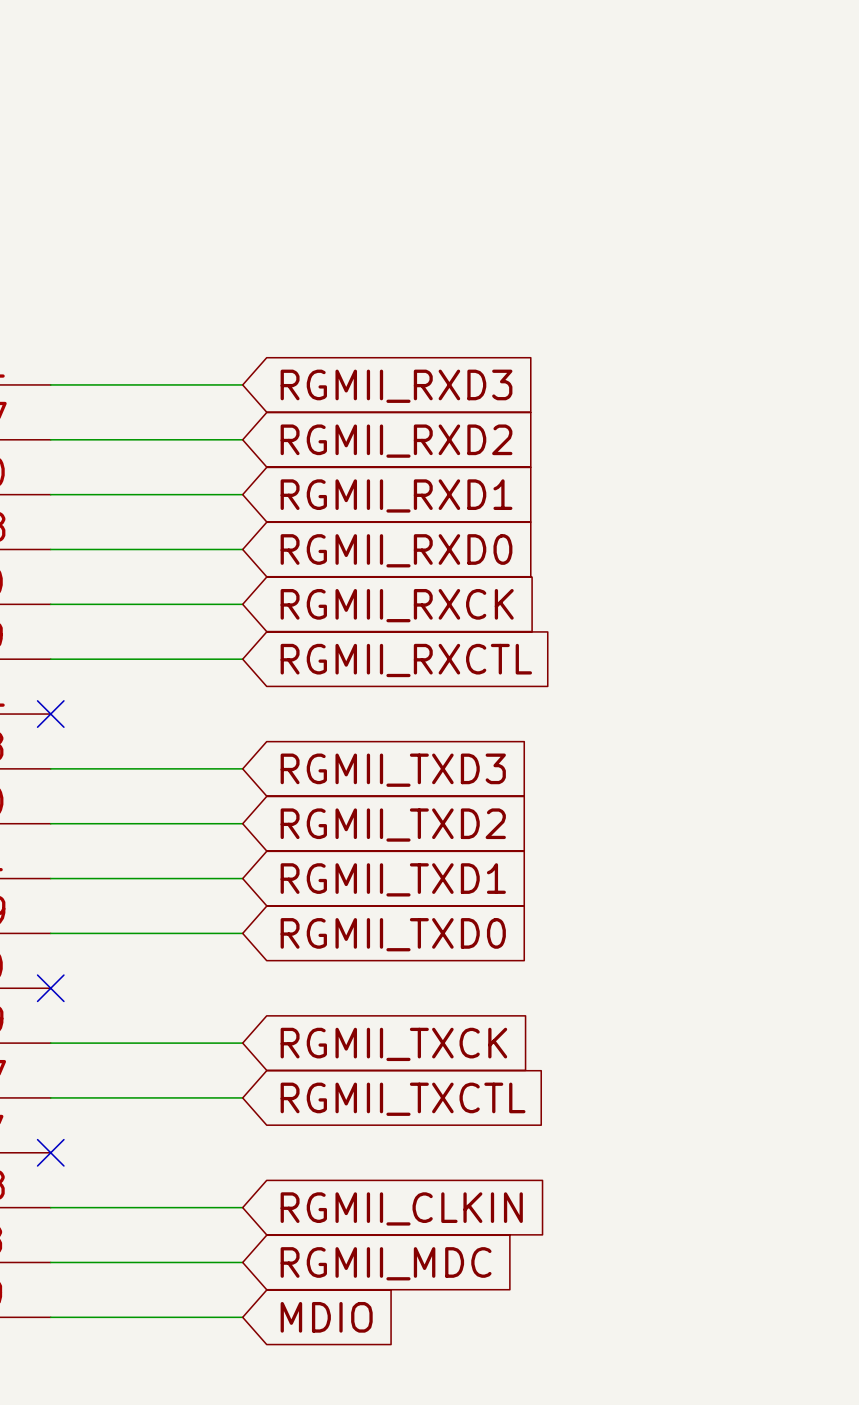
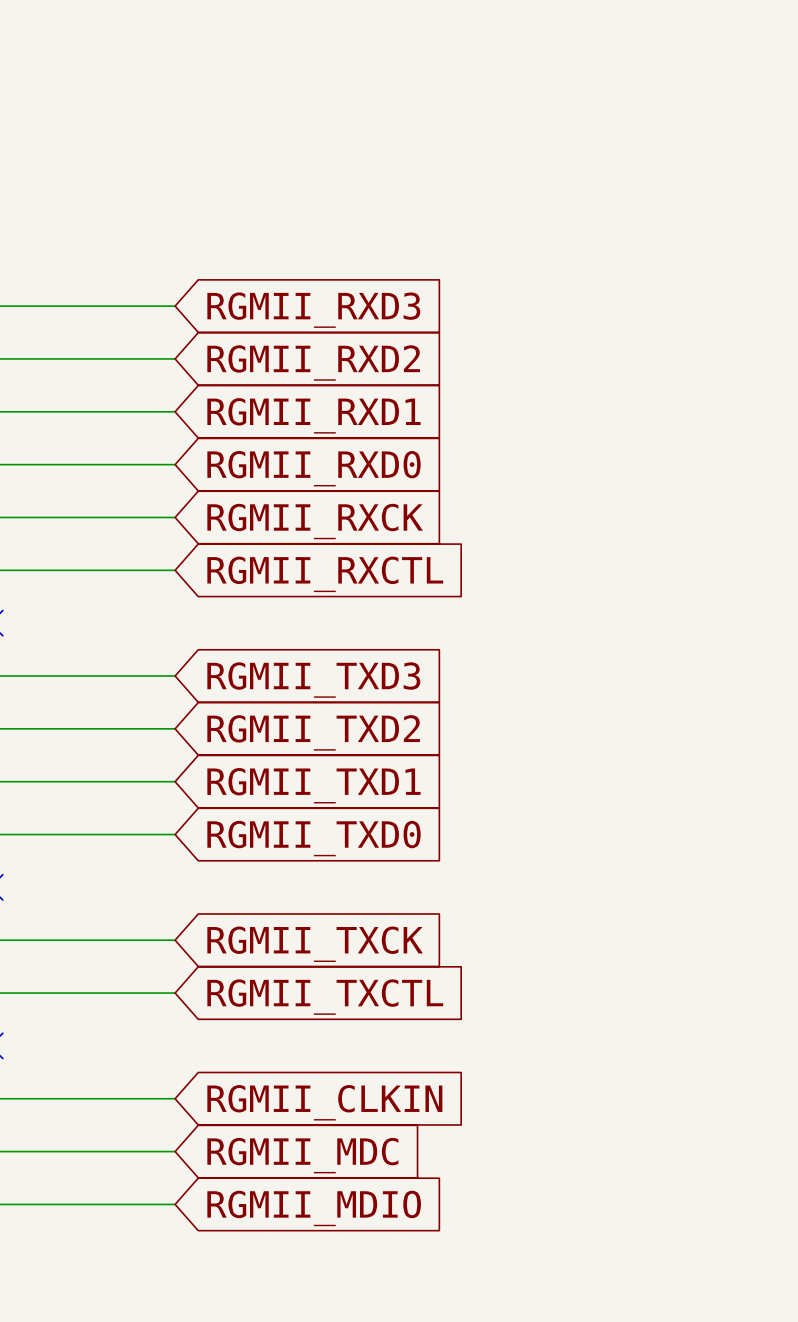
global label: MDIO (326, 1317) -> RGMII_MDIO (314, 1208)

